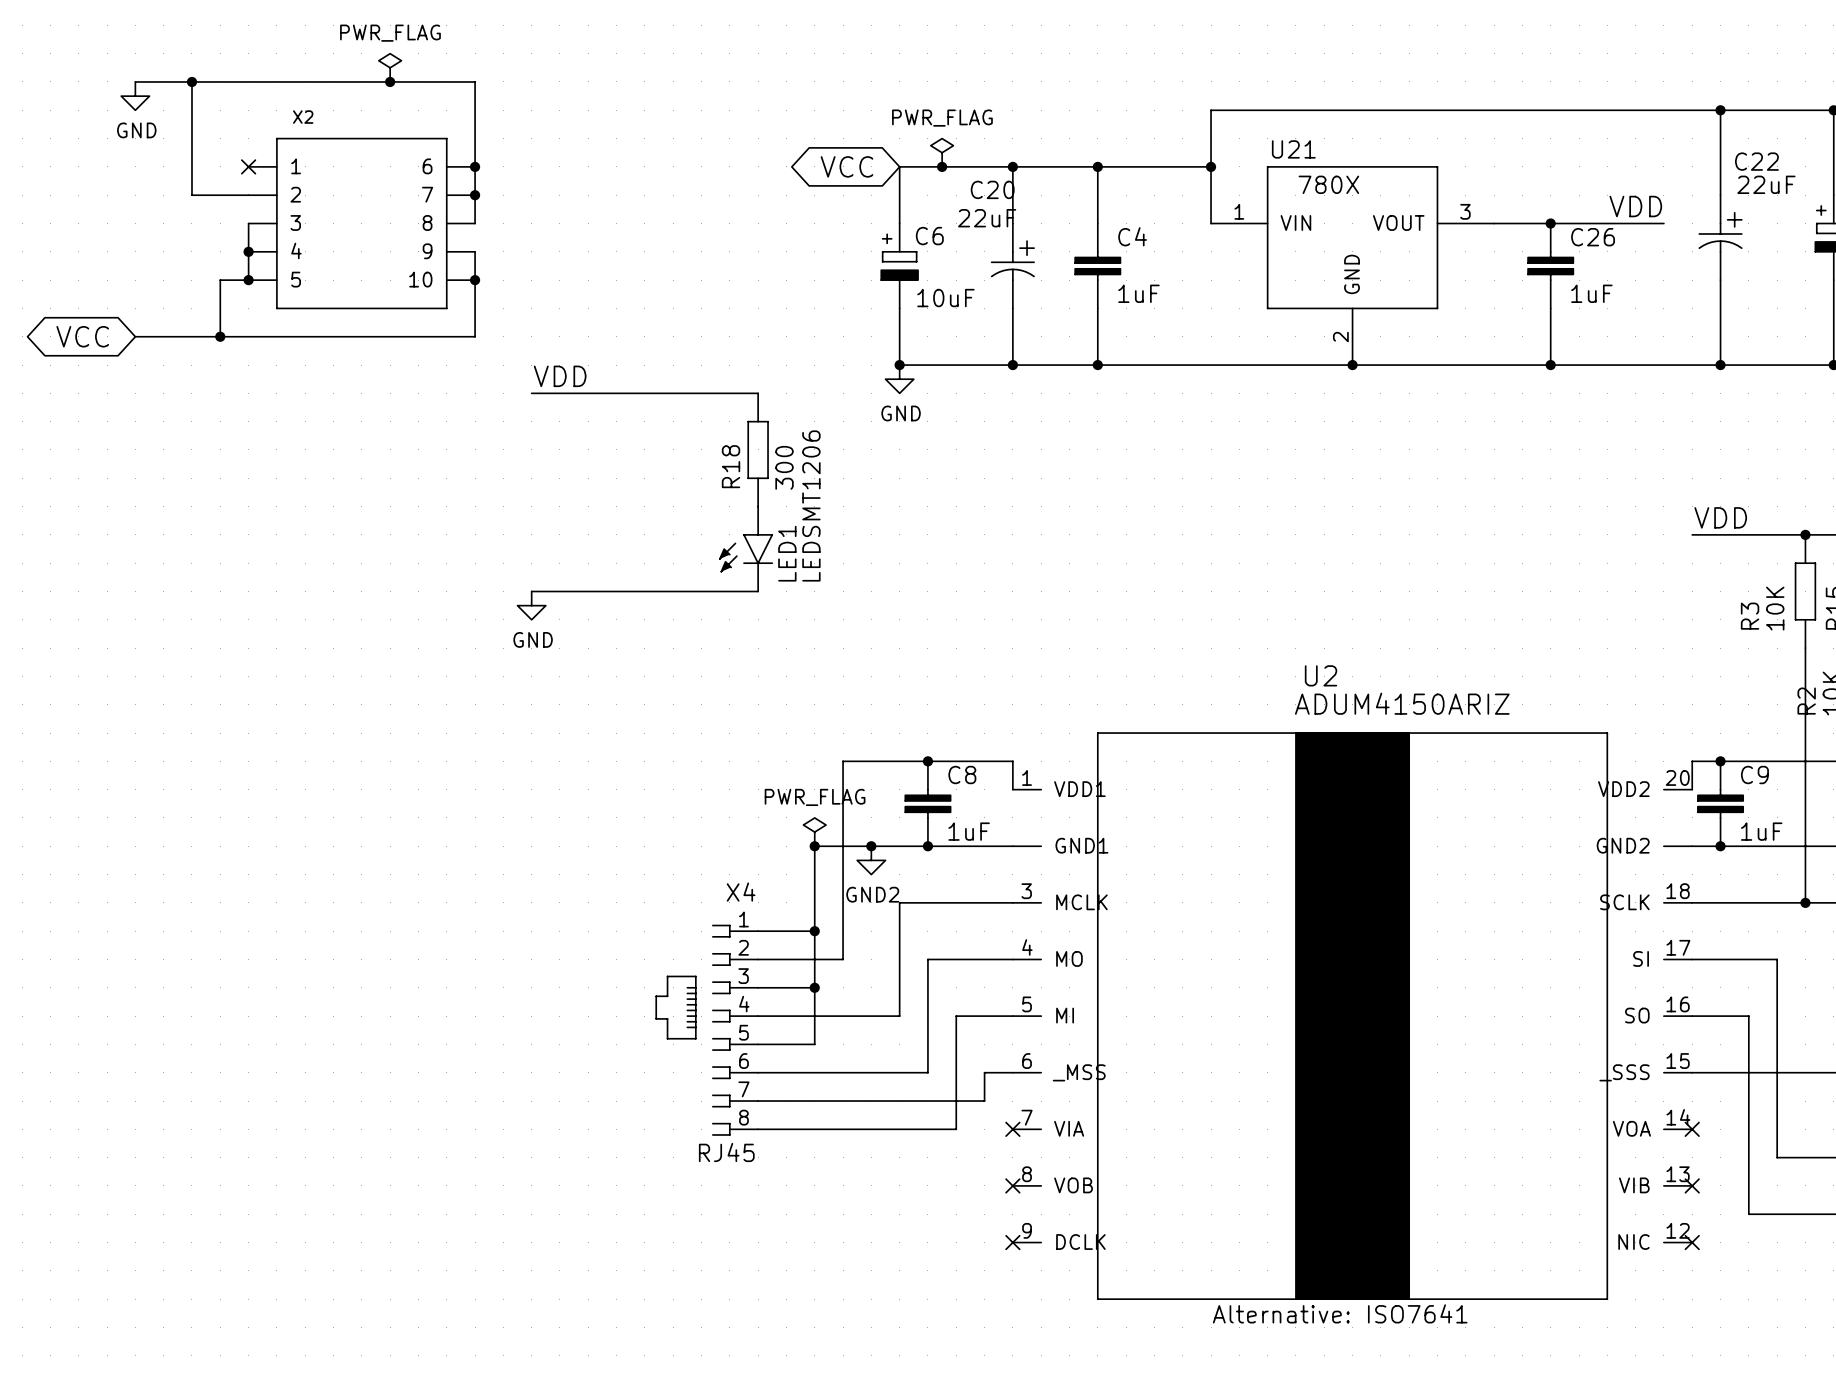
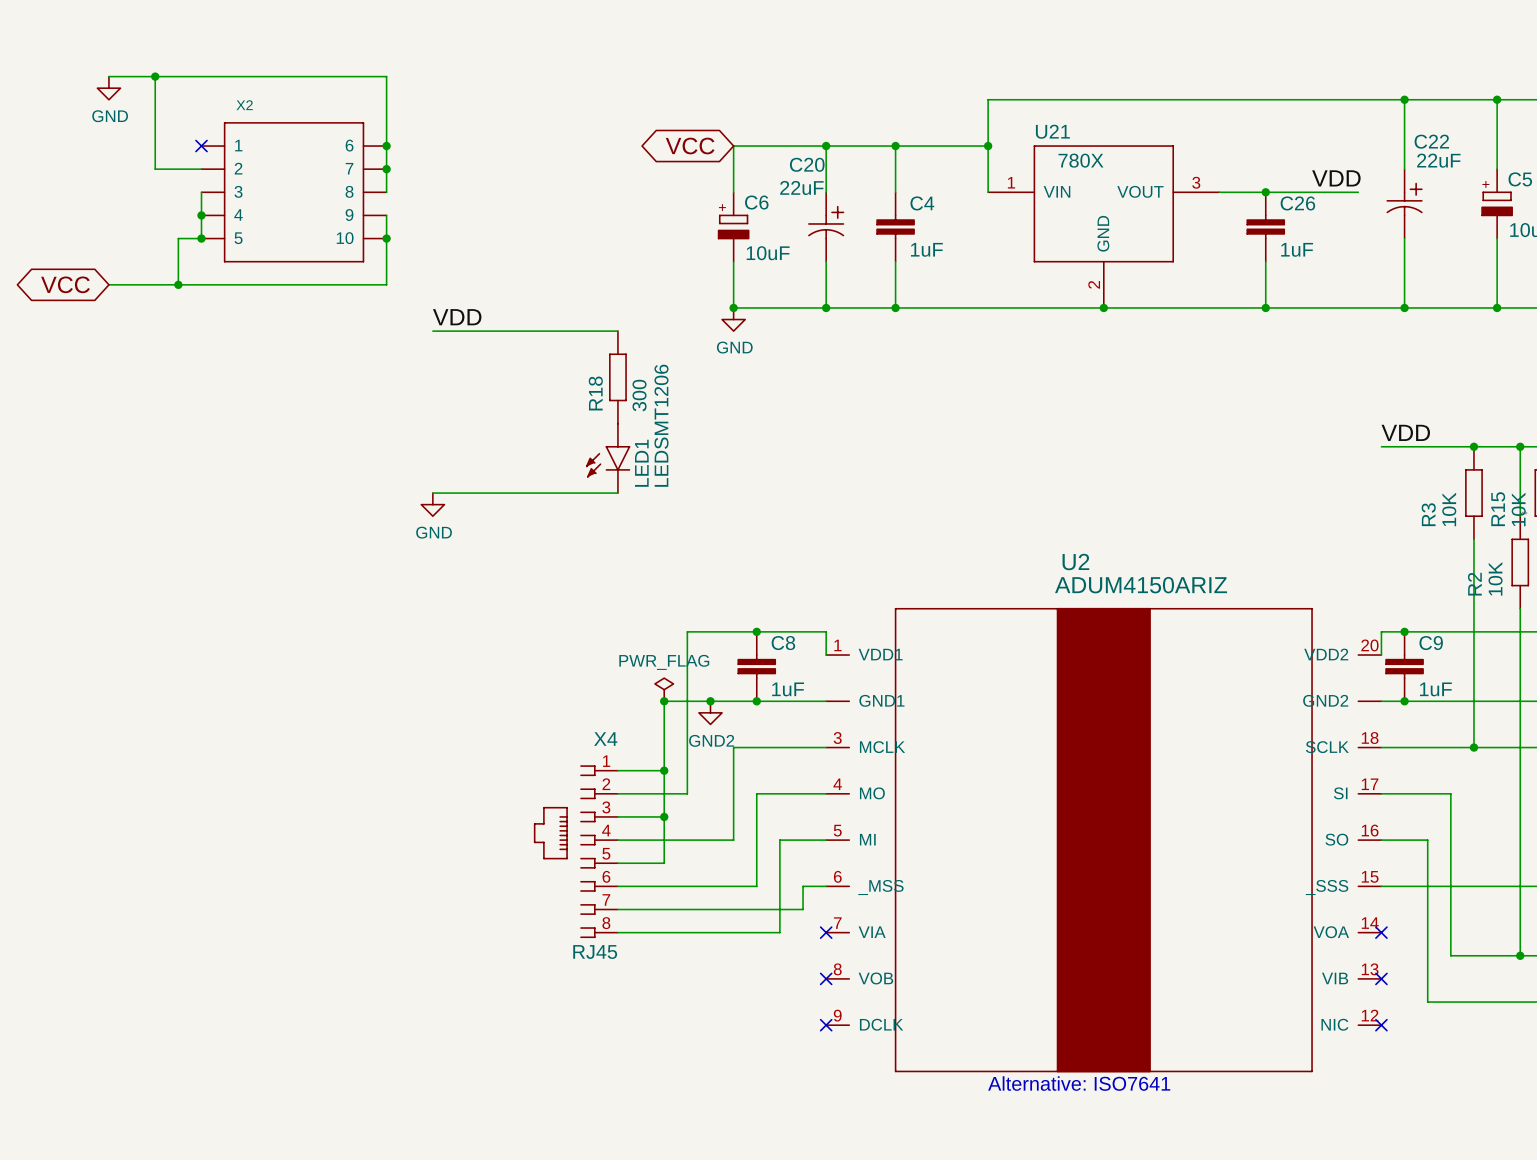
power symbol: PWR_FLAG (390, 67) -> none
junction: (390, 81) -> none
power symbol: PWR_FLAG (942, 152) -> none
junction: (942, 166) -> none

